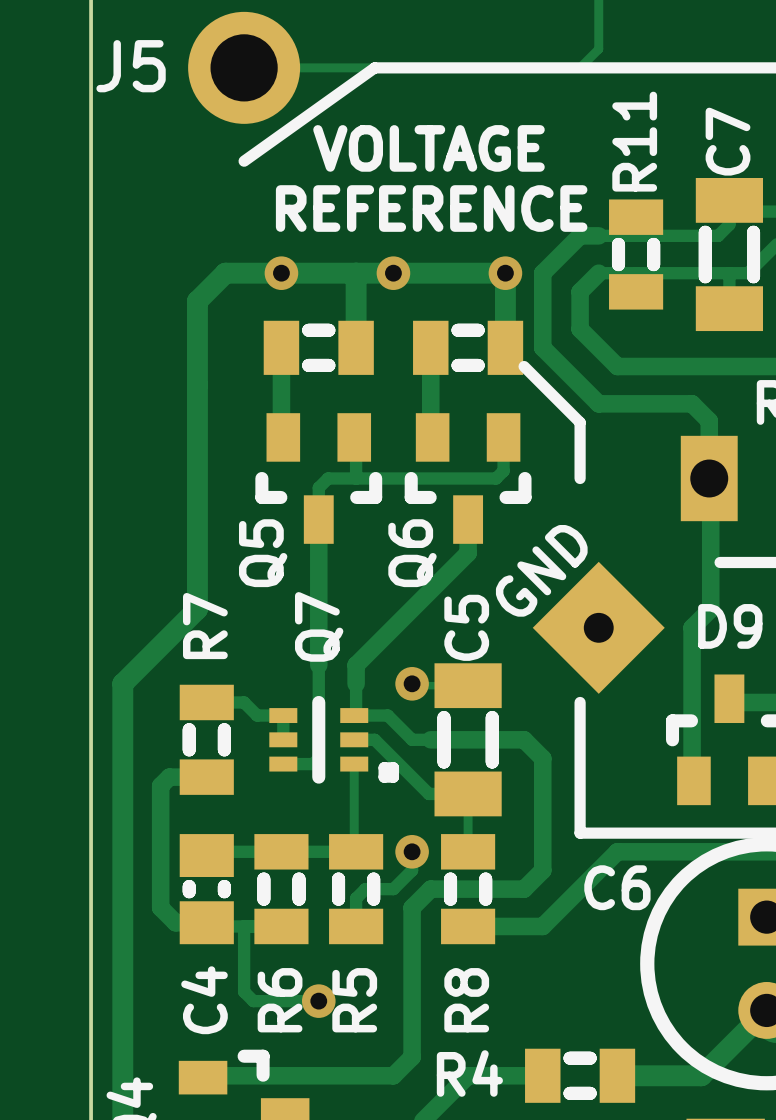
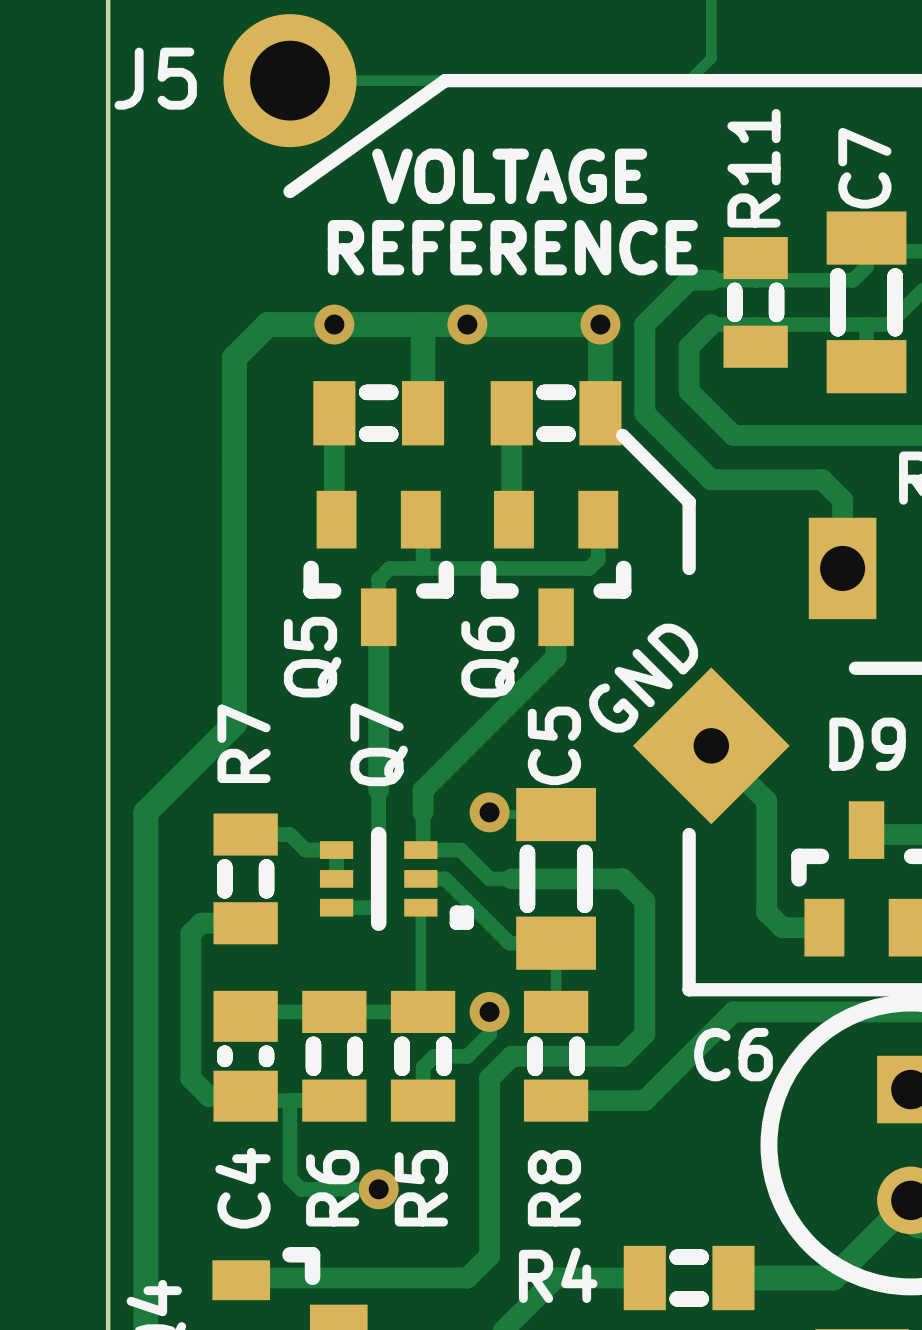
track: (710, 479) (710, 609) (692, 627) (692, 779) -> none
track: none -> (711, 745) (766, 801) (766, 912) (782, 927) (824, 927)

